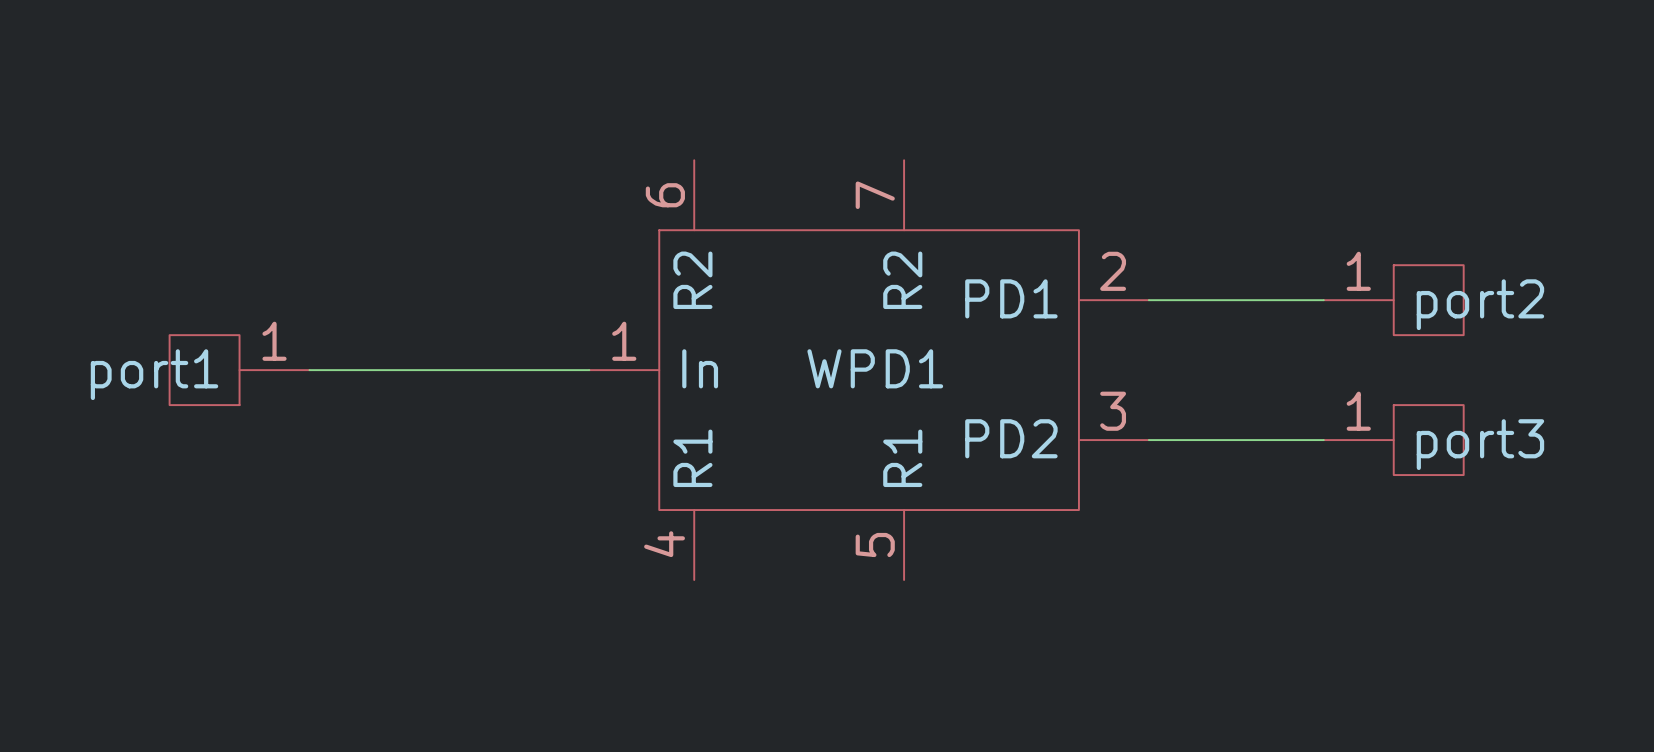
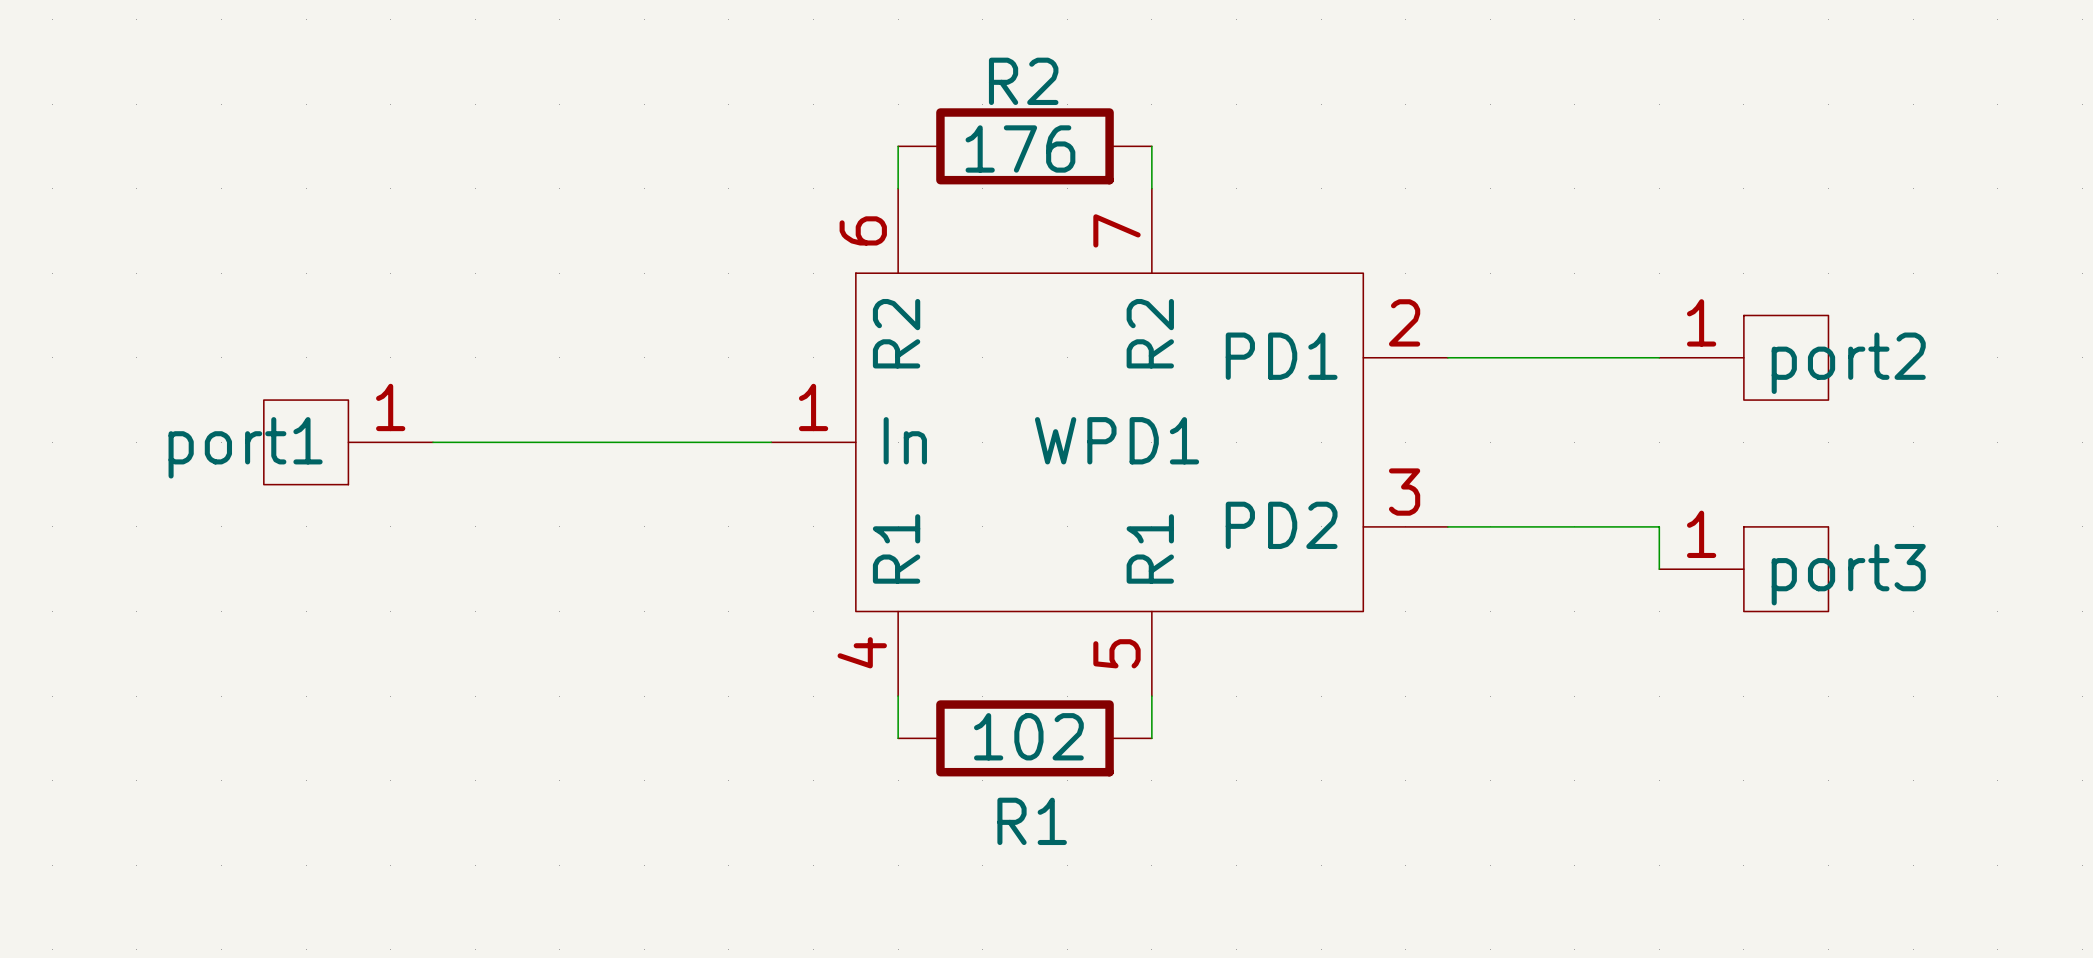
wire: none -> (898, 146) (898, 188)
R2: none -> 176 (1025, 146)
wire: none -> (1151, 146) (1151, 188)
wire: none -> (1659, 526) (1659, 569)
part position: (1393, 440) -> (1743, 569)
wire: none -> (898, 696) (898, 738)
wire: none -> (1151, 696) (1151, 738)
R1: none -> 102 (1025, 738)

